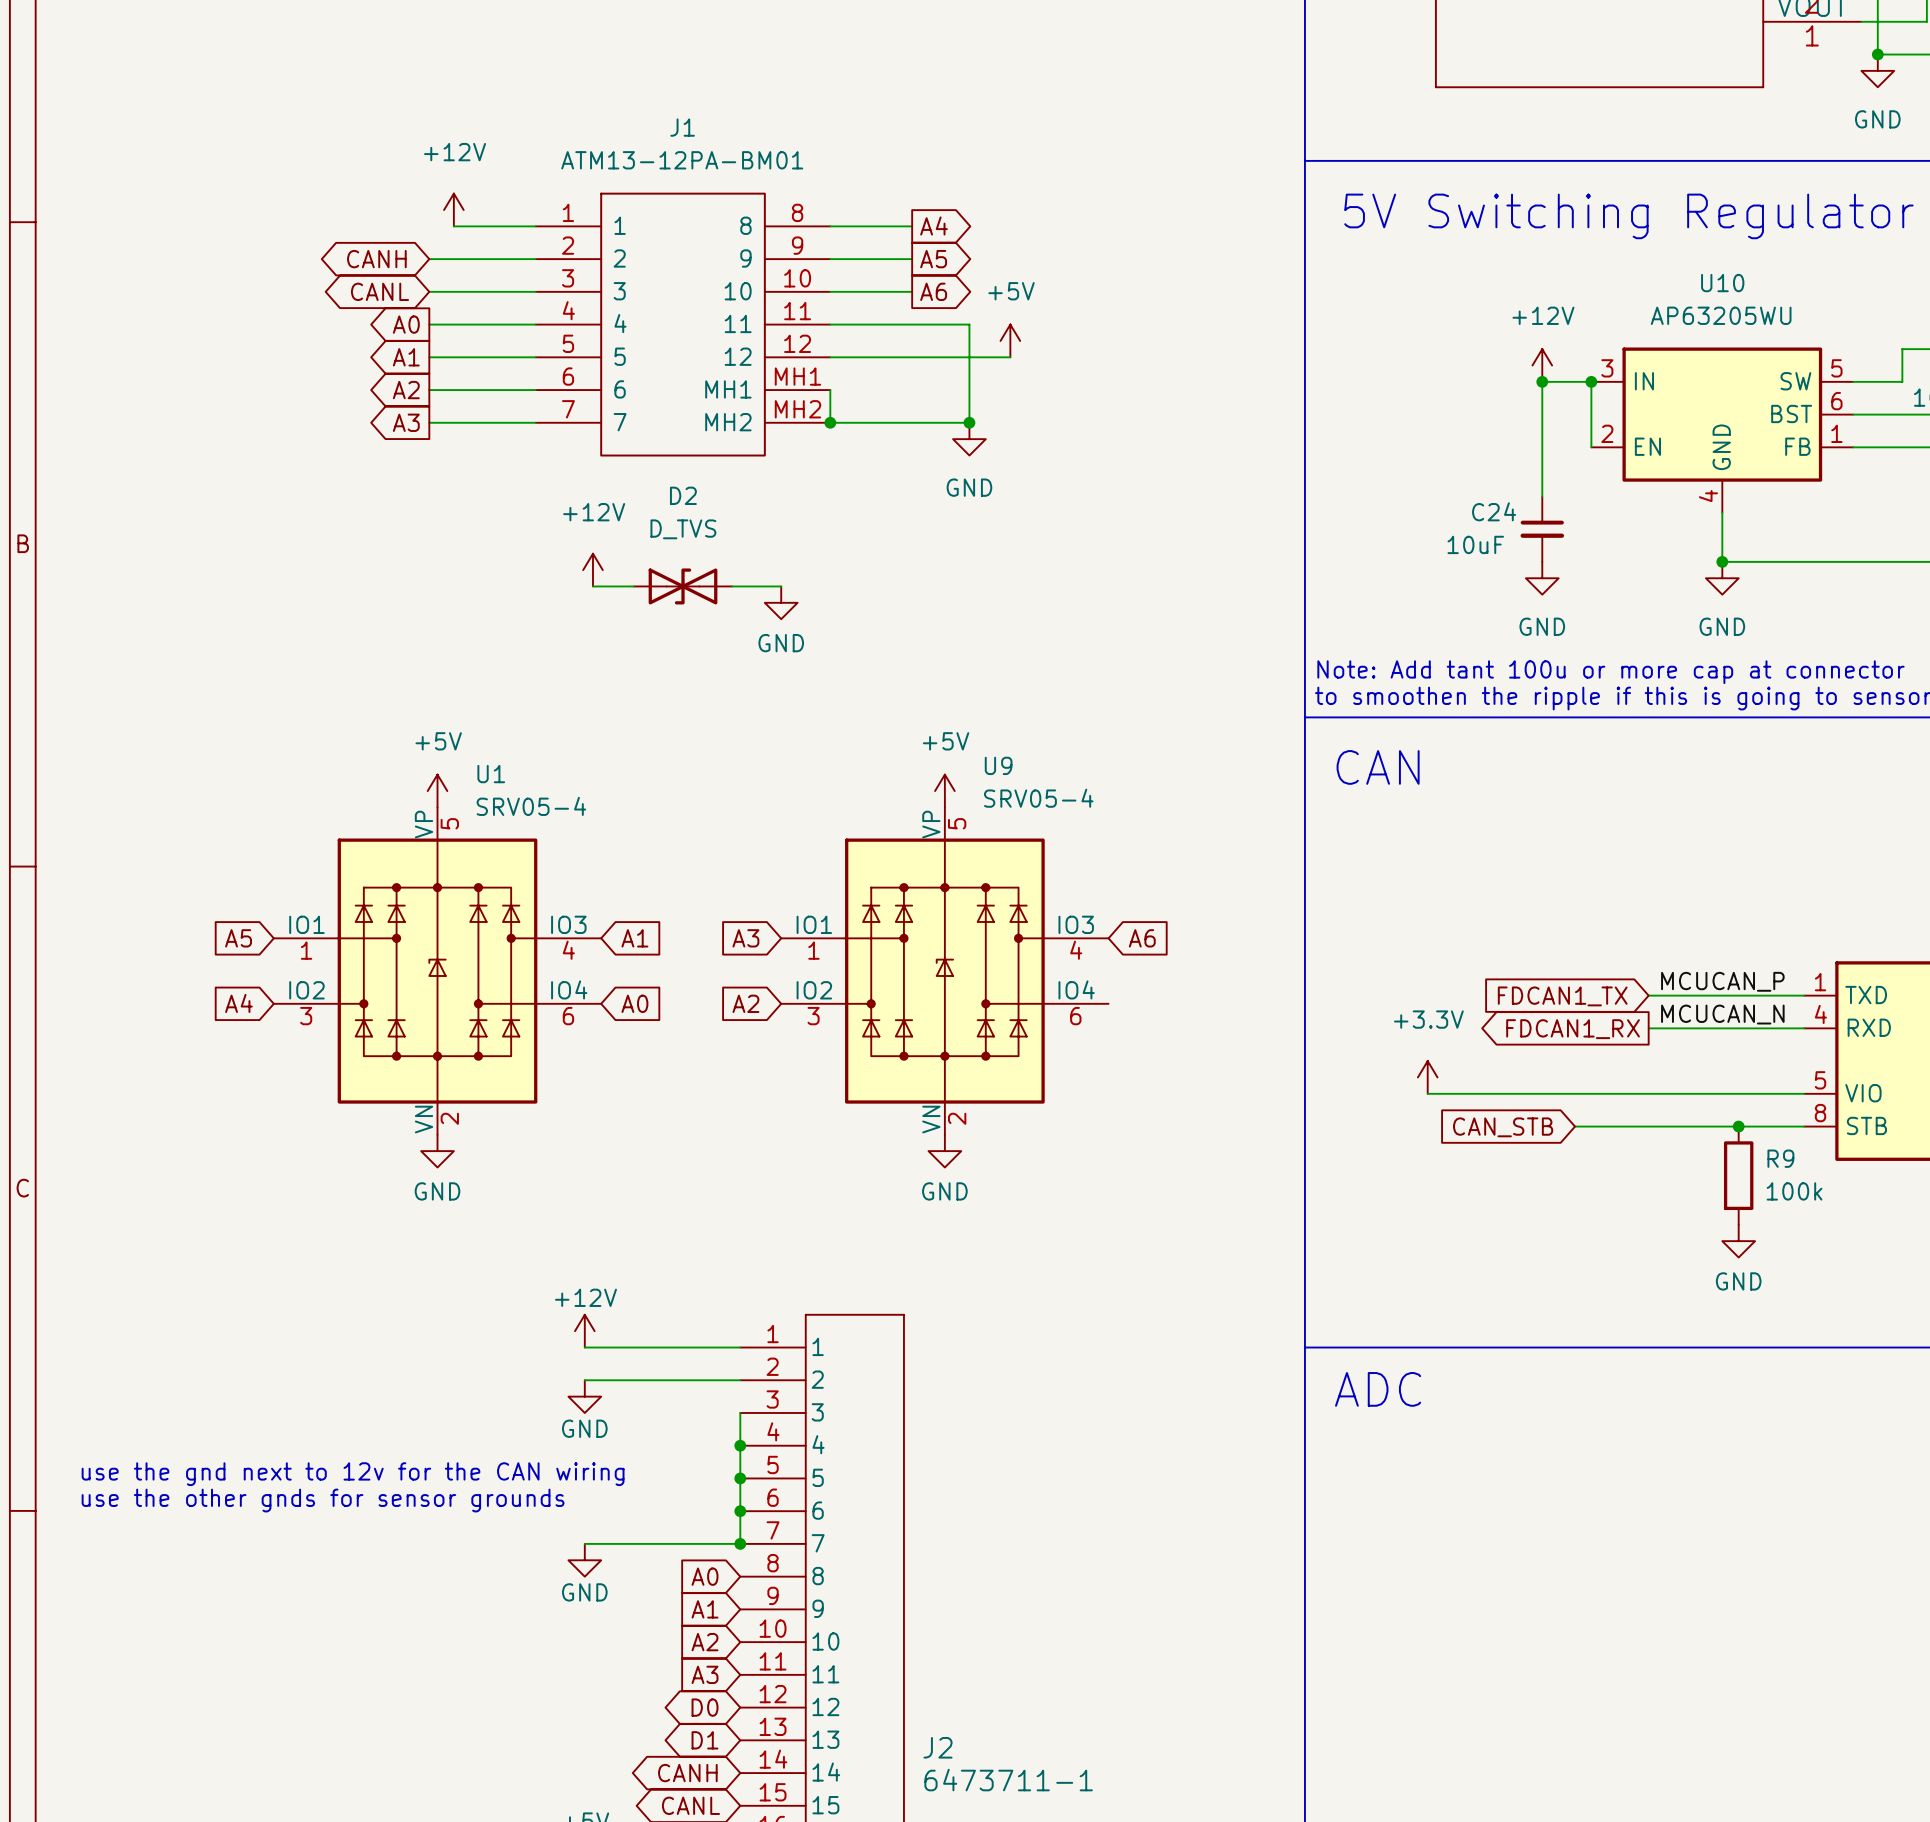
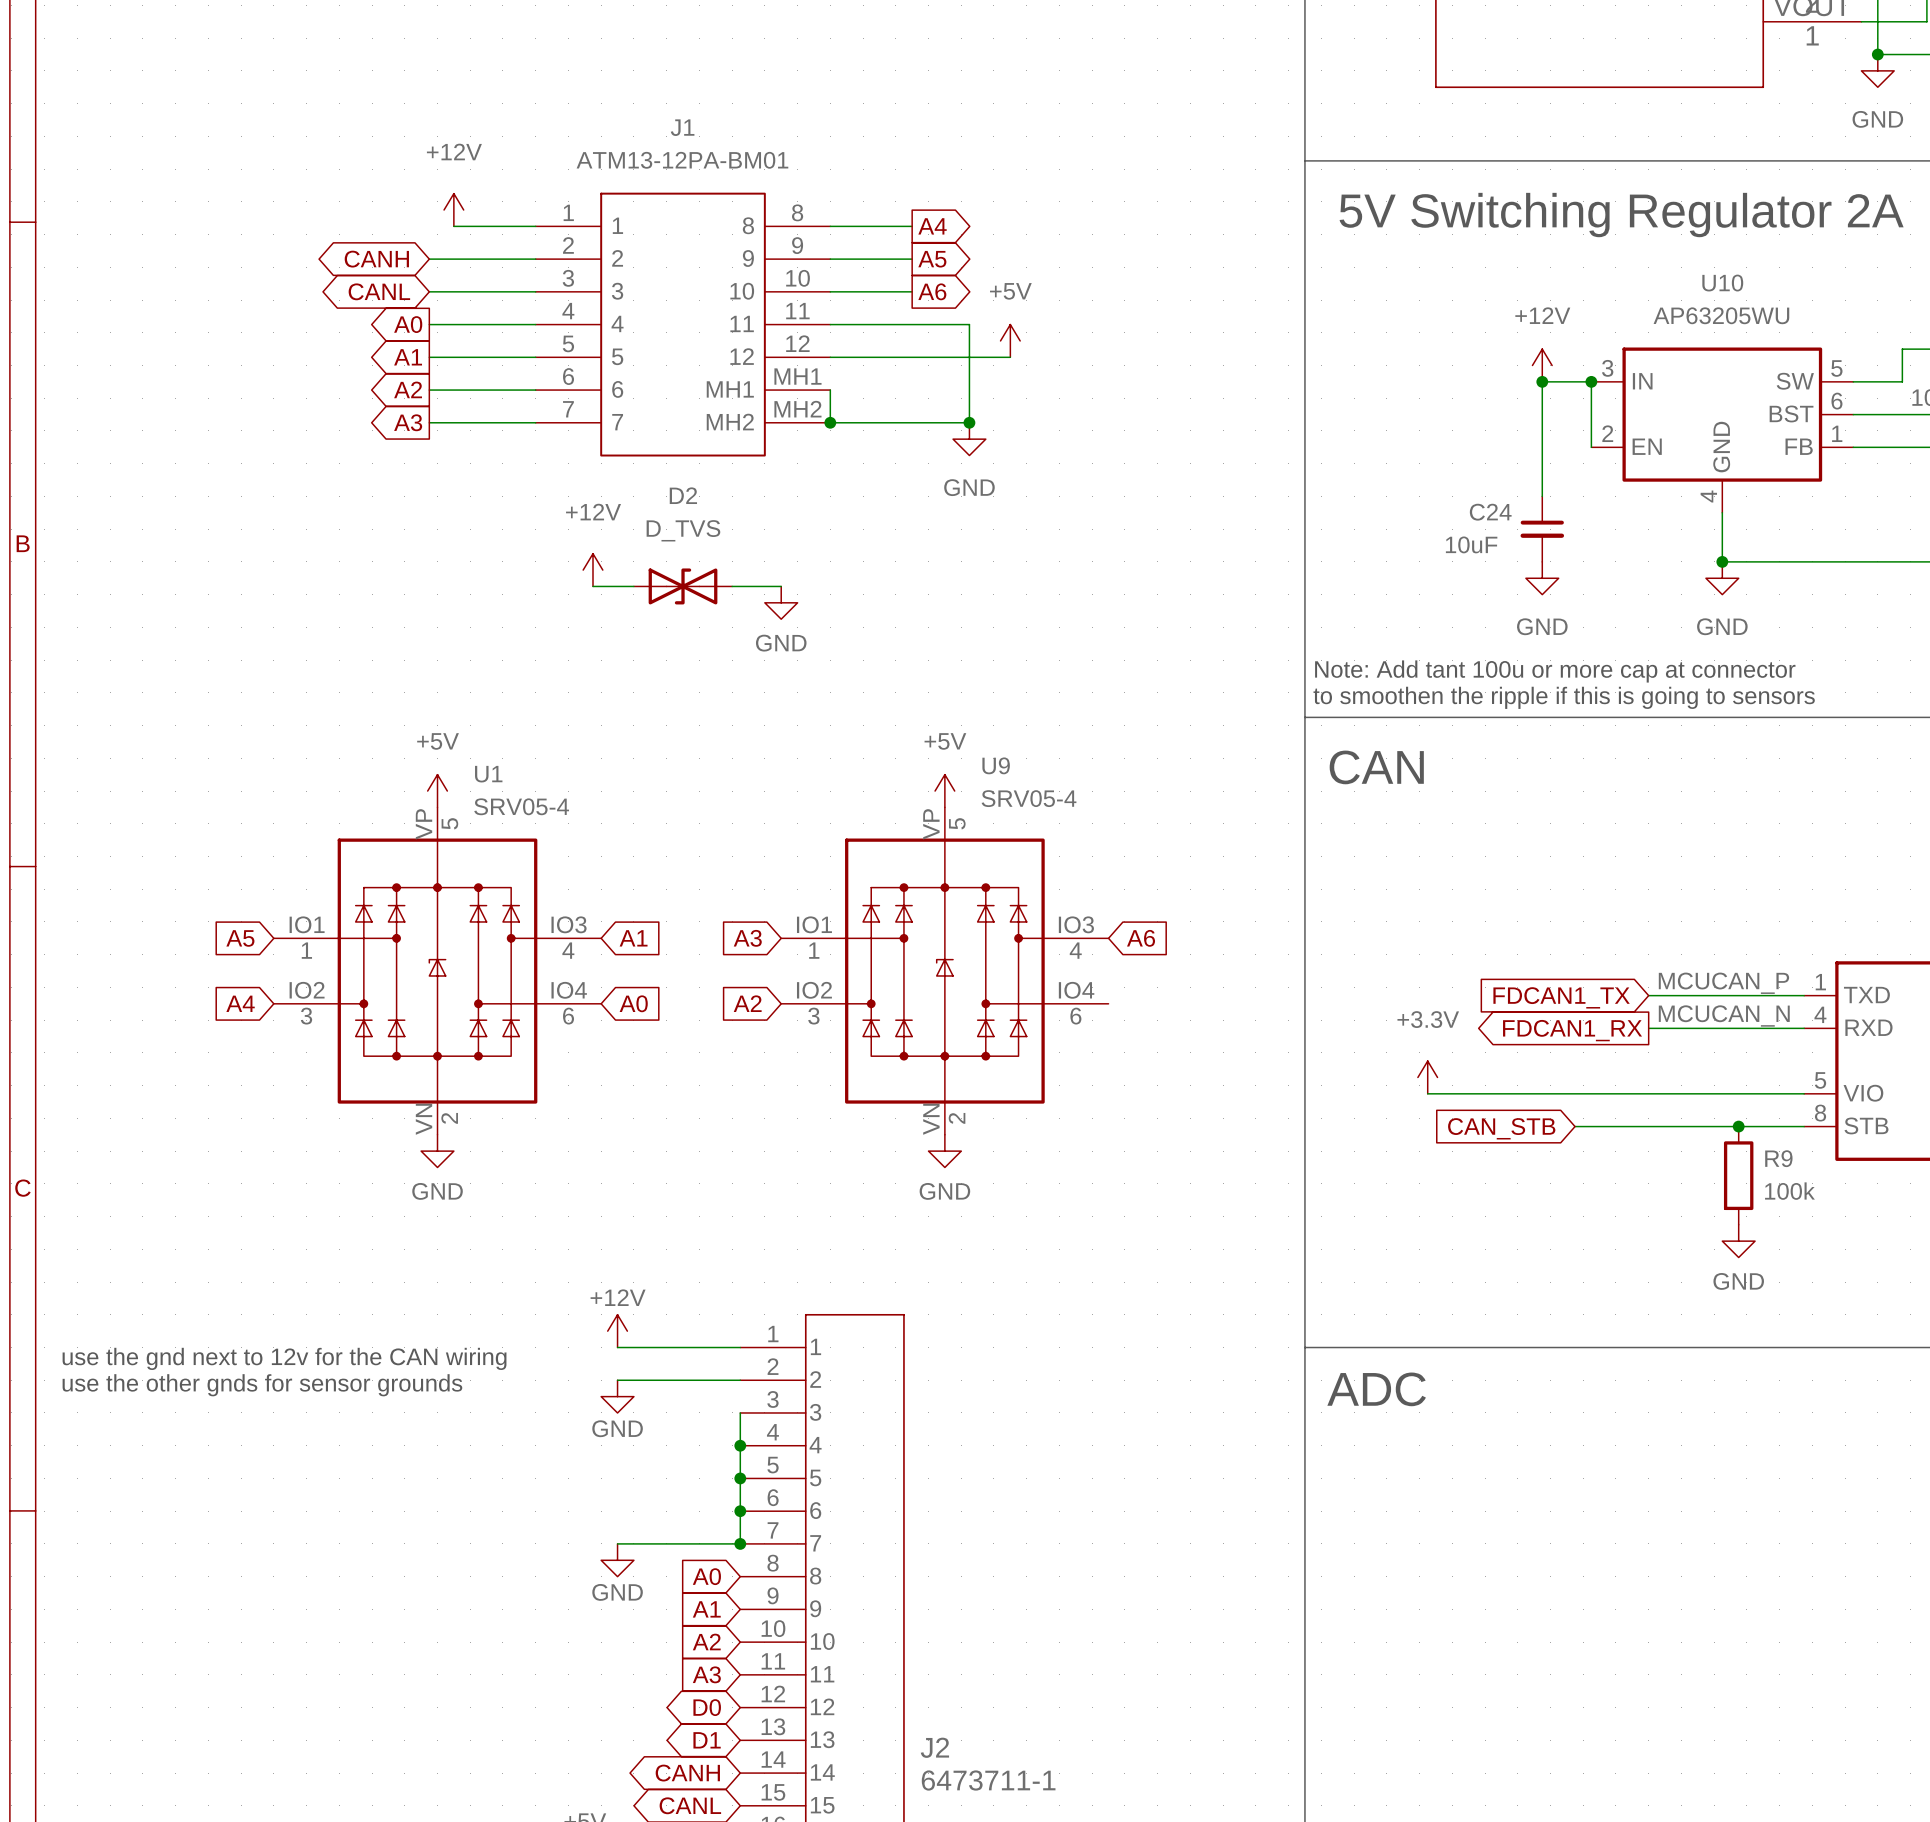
power symbol position: +12V (584, 1331) -> +12V (617, 1331)
wire: (584, 1347) (617, 1347) -> none
wire: (584, 1380) (617, 1380) -> none
power symbol position: GND (584, 1396) -> GND (617, 1396)
text position: use the gnd next to 12v for the CAN wiring (353, 1474) -> use the gnd next to 12v for the CAN wiring (284, 1358)
text position: use the other gnds for sensor grounds (323, 1500) -> use the other gnds for sensor grounds (262, 1385)
wire: (584, 1543) (617, 1543) -> none
power symbol position: GND (584, 1560) -> GND (617, 1560)

